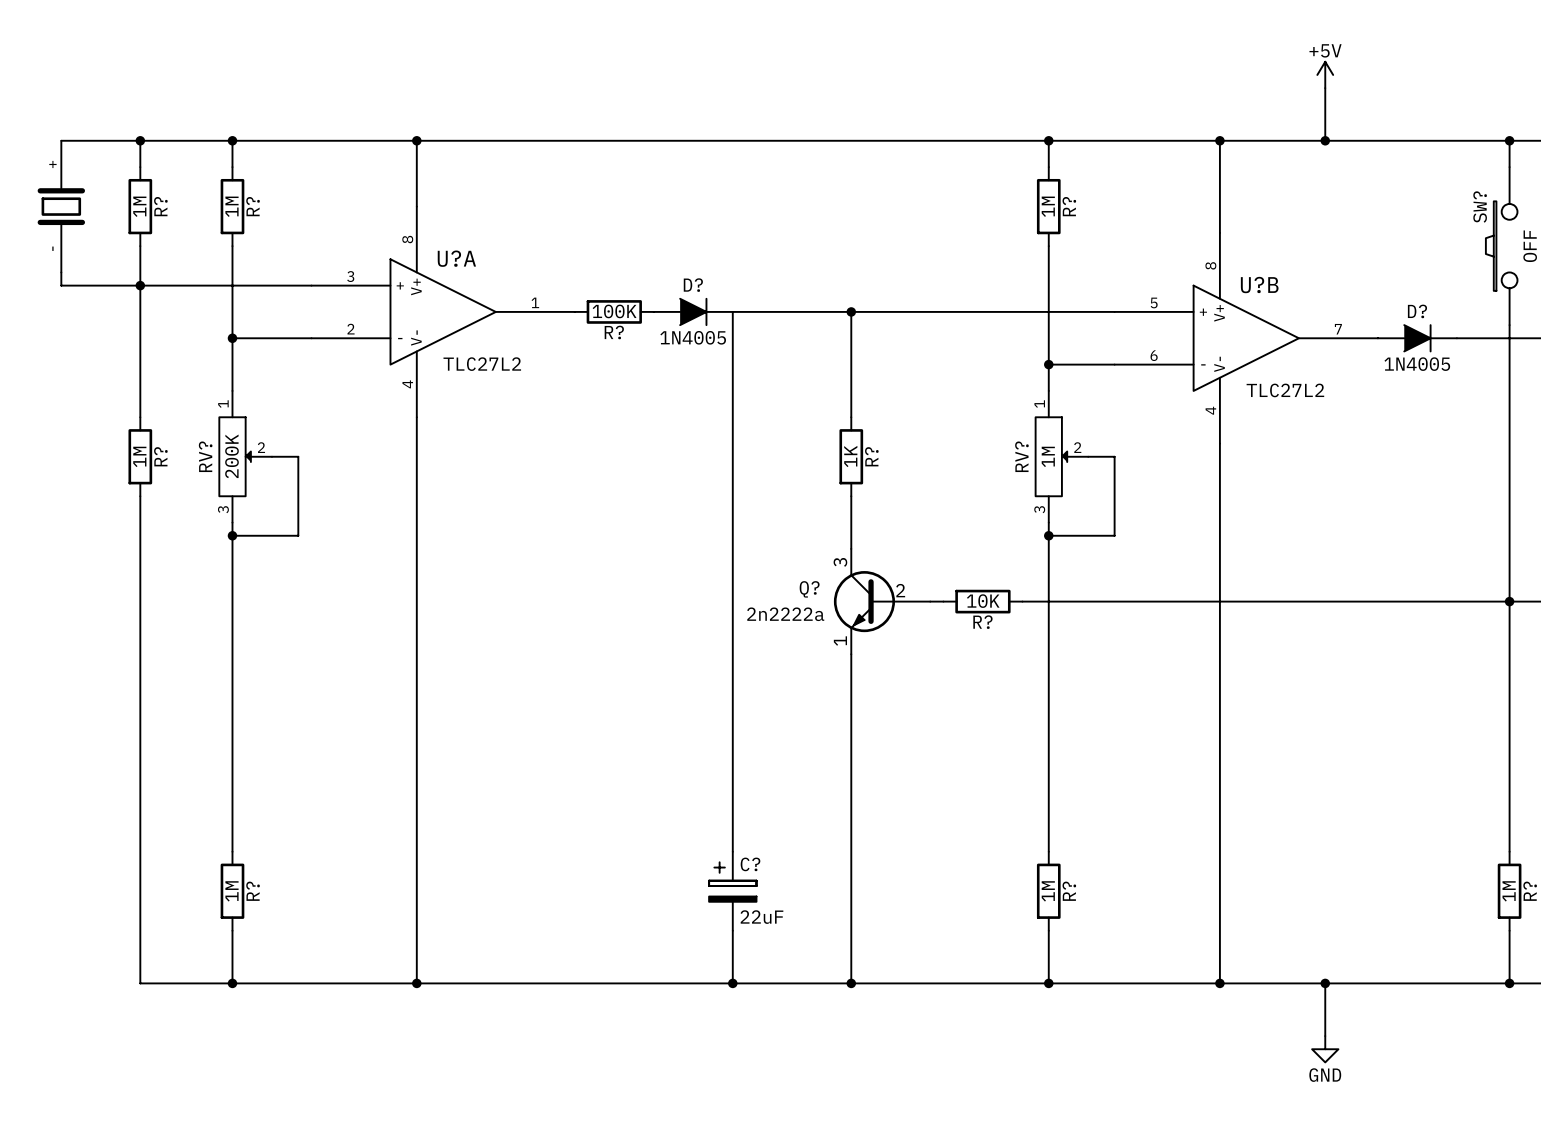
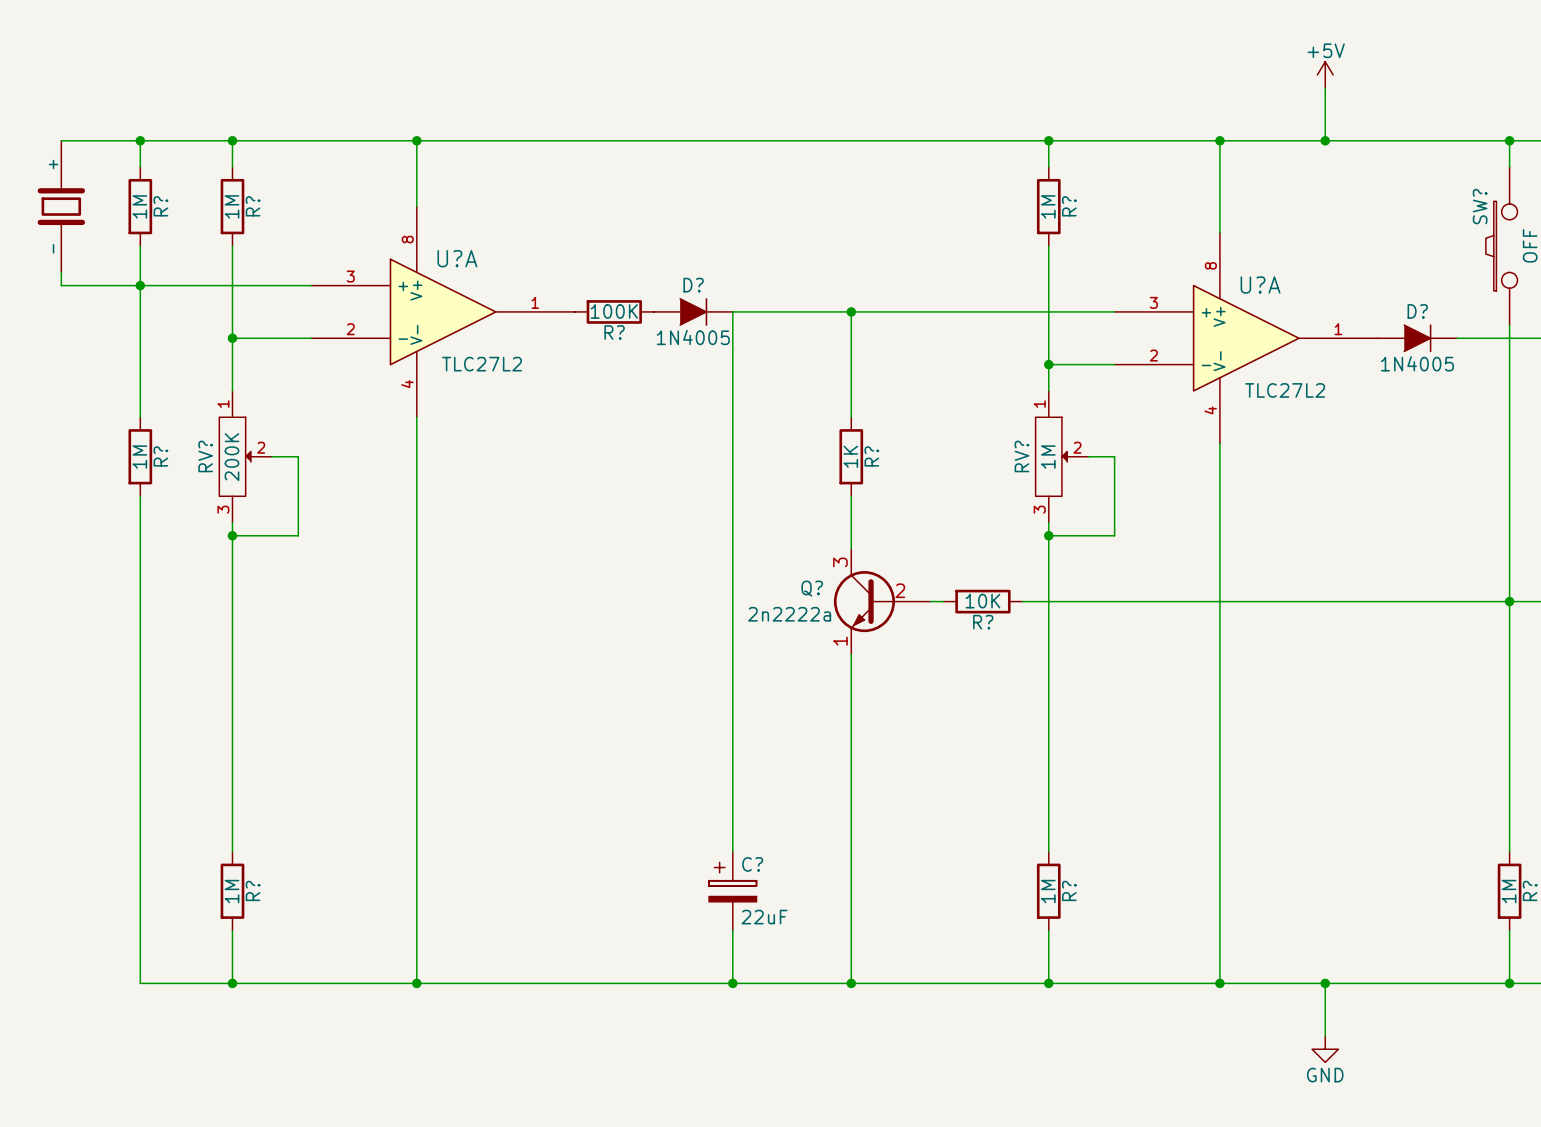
U?B name: U?B (1259, 285) -> U?A (1260, 285)
U?B pin number: 5 (1154, 302) -> 3 (1153, 302)
U?B pin number: 7 (1338, 329) -> 1 (1338, 329)
U?B pin number: 6 (1154, 355) -> 2 (1153, 355)

